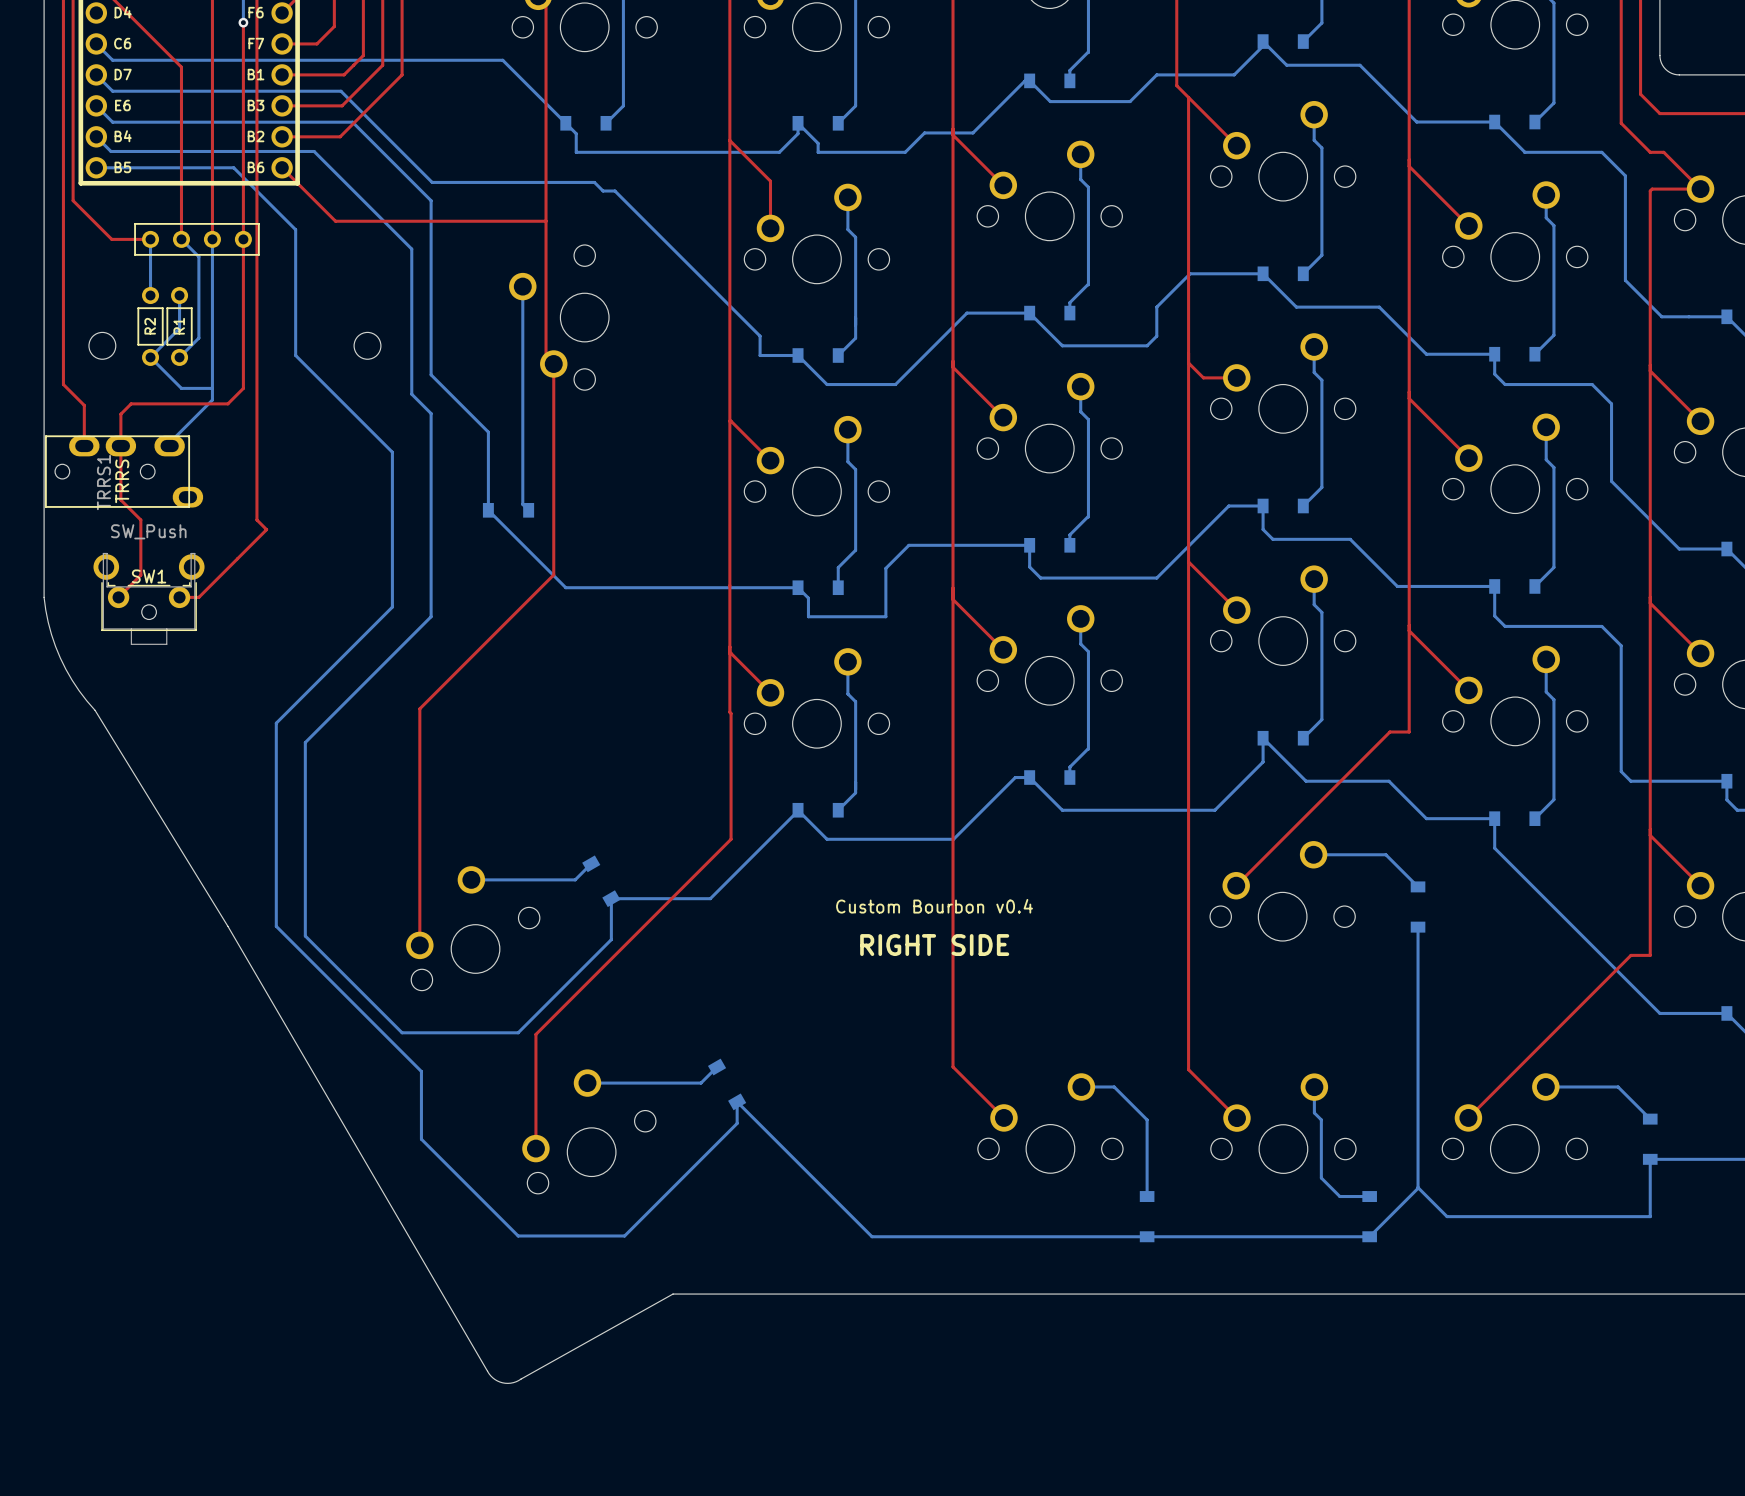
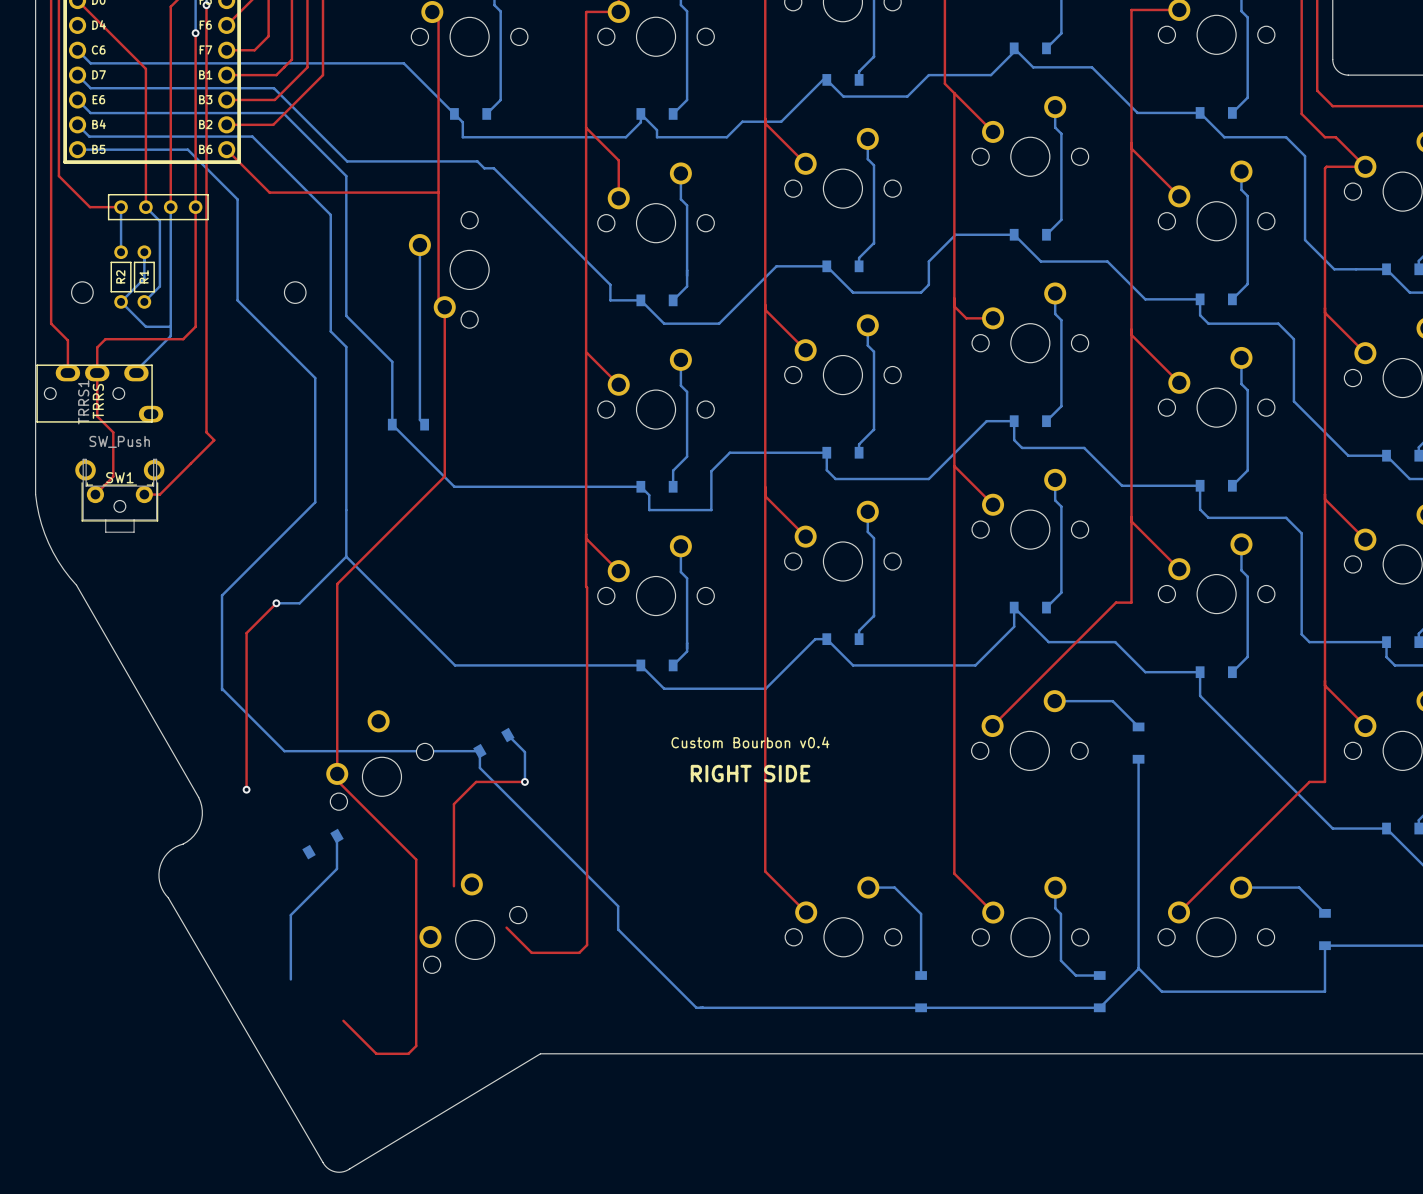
bottom track: (431, 616) (305, 742) (305, 936) (402, 1032) (518, 1032) (611, 939) (611, 898) (710, 898) (798, 811) -> (346, 510) (346, 556)
bottom track: none -> (346, 556) (455, 665) (640, 665)
bottom track: none -> (346, 556) (299, 603) (276, 603)
board edge: (95, 710) (227, 926) (490, 1375) (502, 1382) (516, 1381) (673, 1294) -> (76, 585) (200, 801) (202, 815) (196, 832) (187, 841) (169, 850) (161, 863) (158, 874) (161, 888) (325, 1166) (337, 1172) (347, 1170) (540, 1053)
top track: none -> (276, 603) (246, 633) (246, 789)
via: none -> (276, 603)
top track: (731, 839) (535, 1034) (535, 1148) -> (587, 688) (587, 945) (579, 952) (531, 952) (506, 927)
bottom track: (276, 841) (276, 926) (421, 1071) (421, 1139) (518, 1235) (624, 1235) (737, 1123) (737, 1101) (872, 1236) -> (222, 688) (284, 751) (479, 751) (479, 767) (618, 906) (618, 929) (696, 1007) (700, 1007)
bottom track: (591, 863) (575, 879) (471, 879) -> none
part rotation: 0° (601, 881) -> 90° clockwise (493, 743)
bottom track: none -> (507, 735) (524, 752) (524, 781)
top track: none -> (337, 773) (337, 780) (416, 859) (416, 1046) (408, 1053) (376, 1053) (343, 1020)
top track: none -> (524, 781) (476, 781) (453, 804) (453, 886)
via: none -> (524, 781)
via: none -> (246, 789)
bottom track: none -> (336, 836) (336, 868) (290, 915) (290, 979)
part: none -> (323, 844)
bottom track: (717, 1067) (701, 1083) (587, 1083) -> none
part: (727, 1084) -> none

